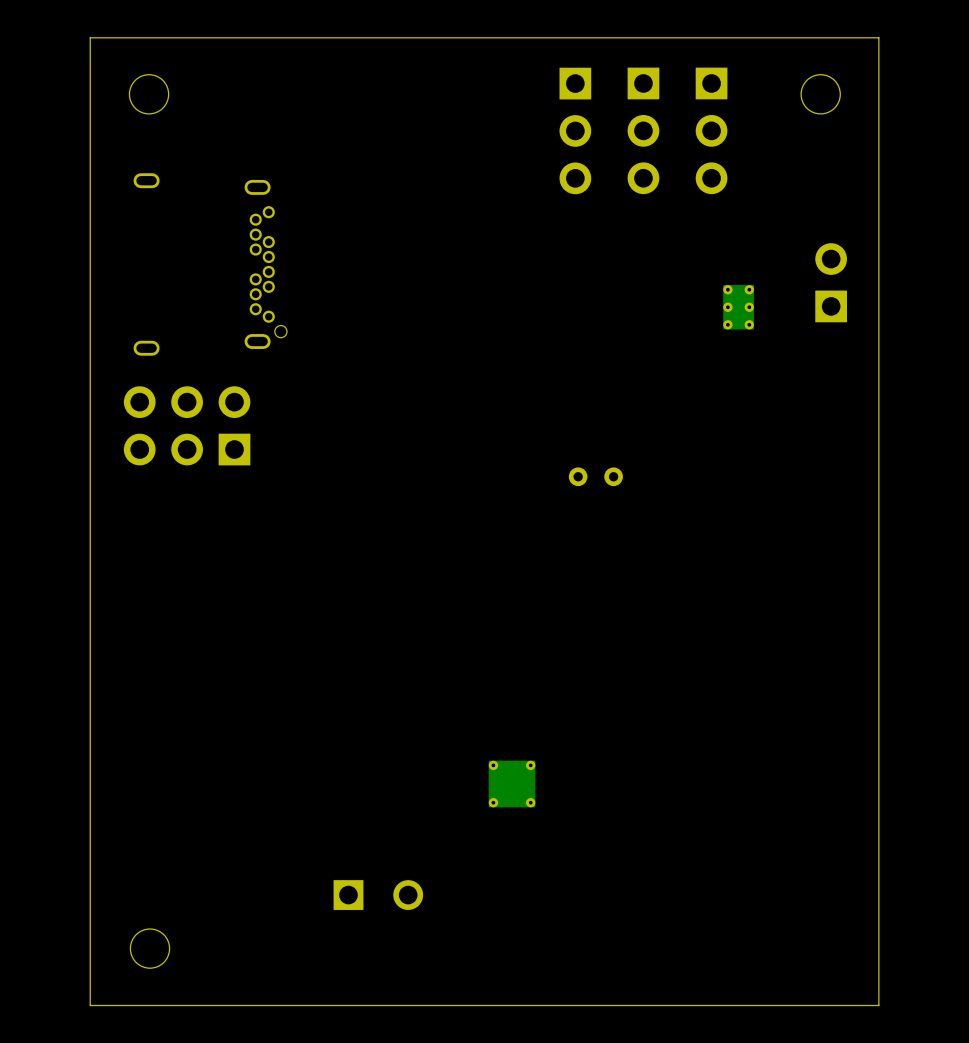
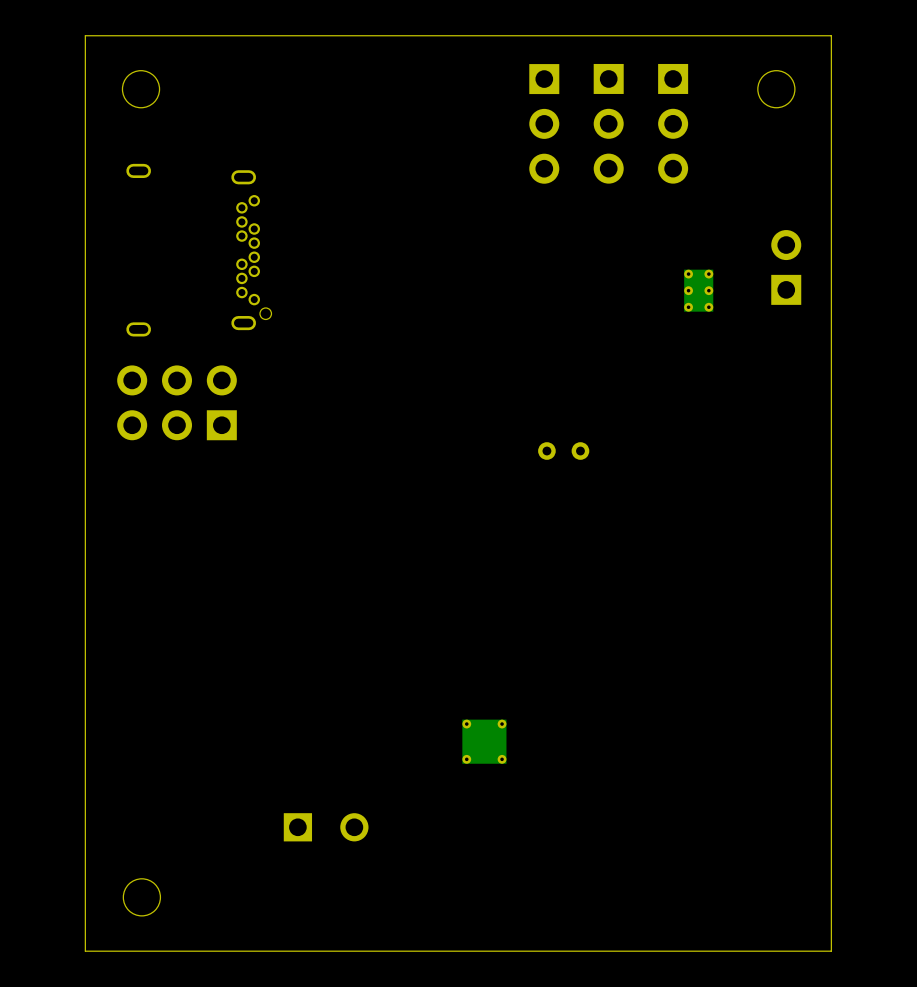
part position: (378, 895) -> (326, 827)

